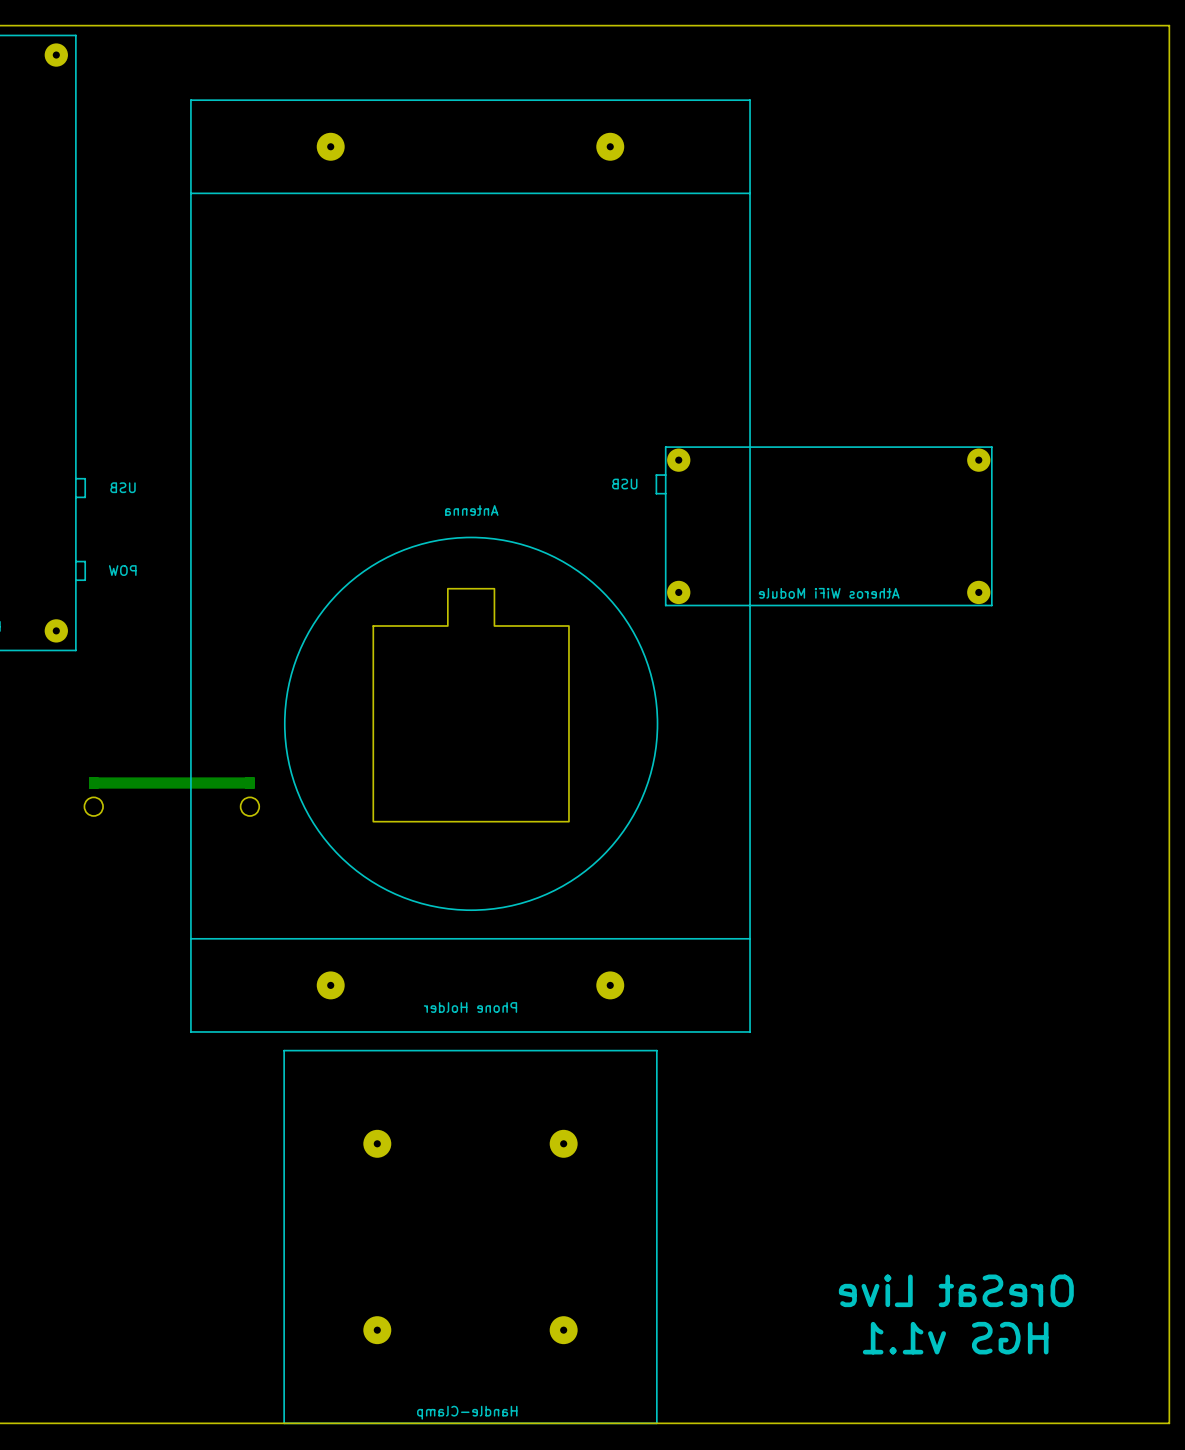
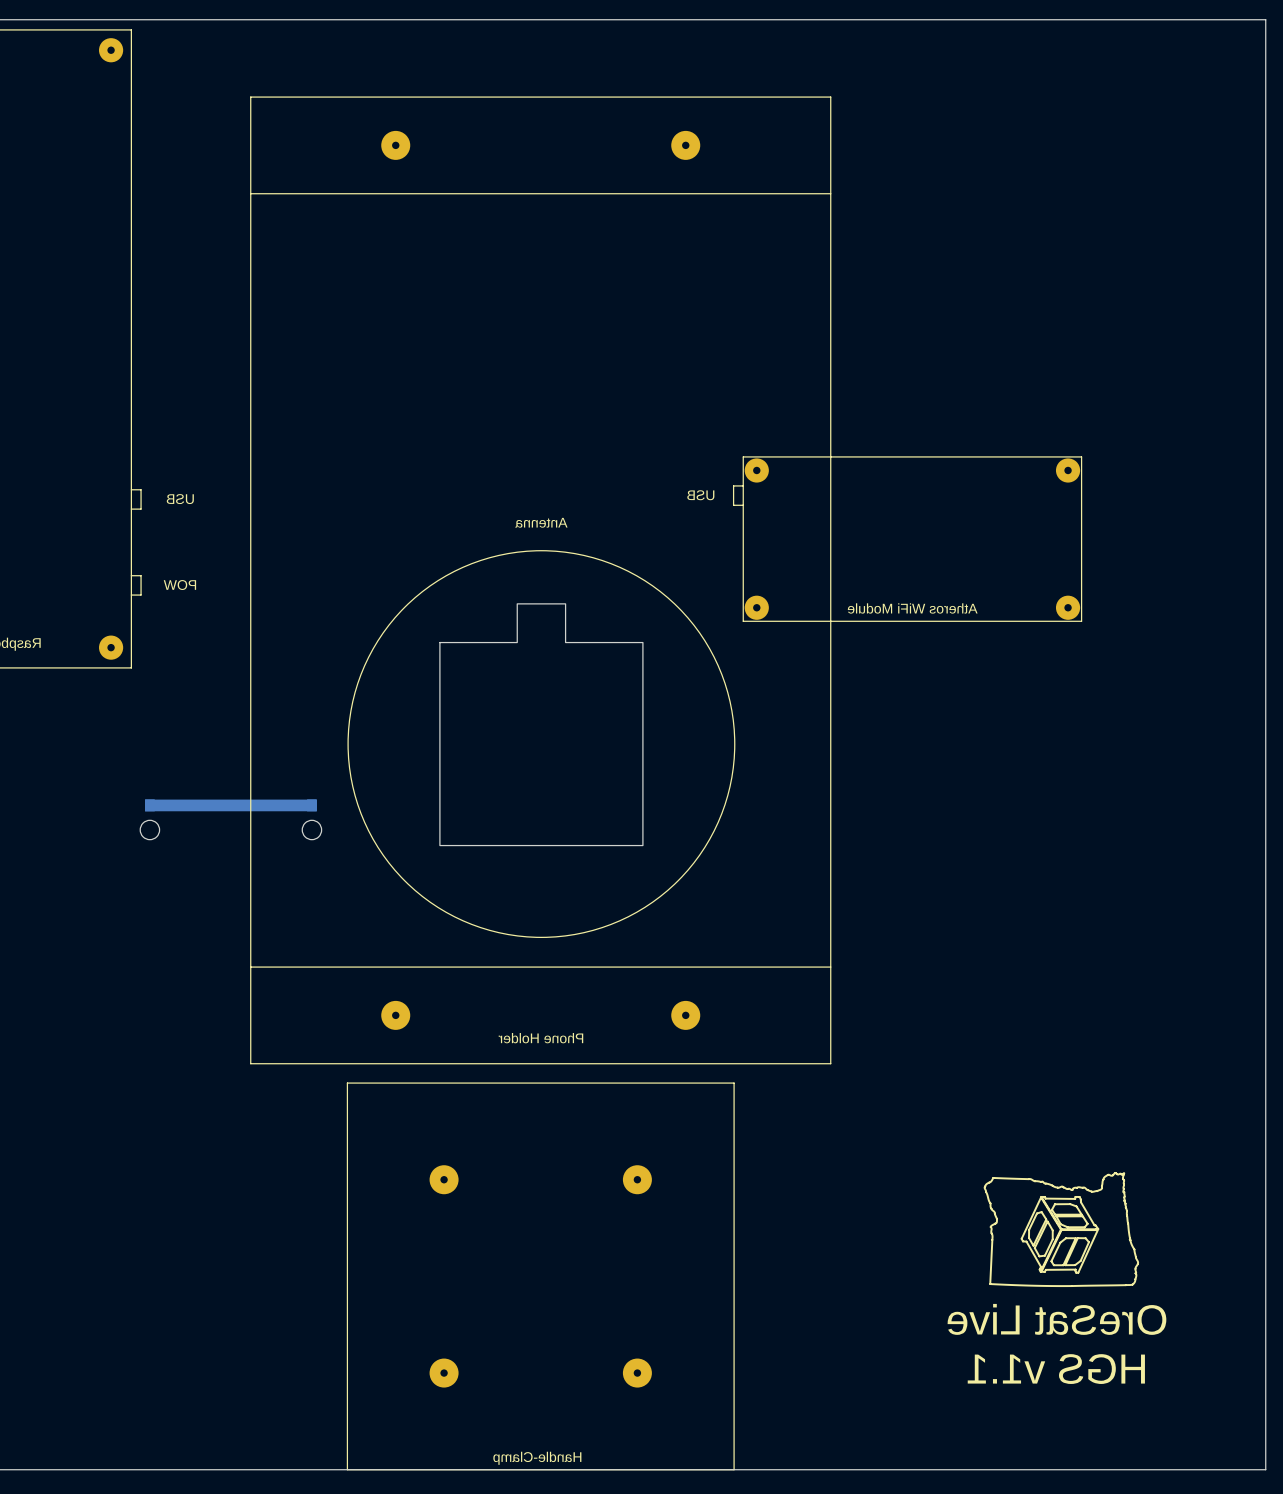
drawing: none -> [983, 1171, 1140, 1288]
drawing: [838, 1274, 1074, 1355] -> none

